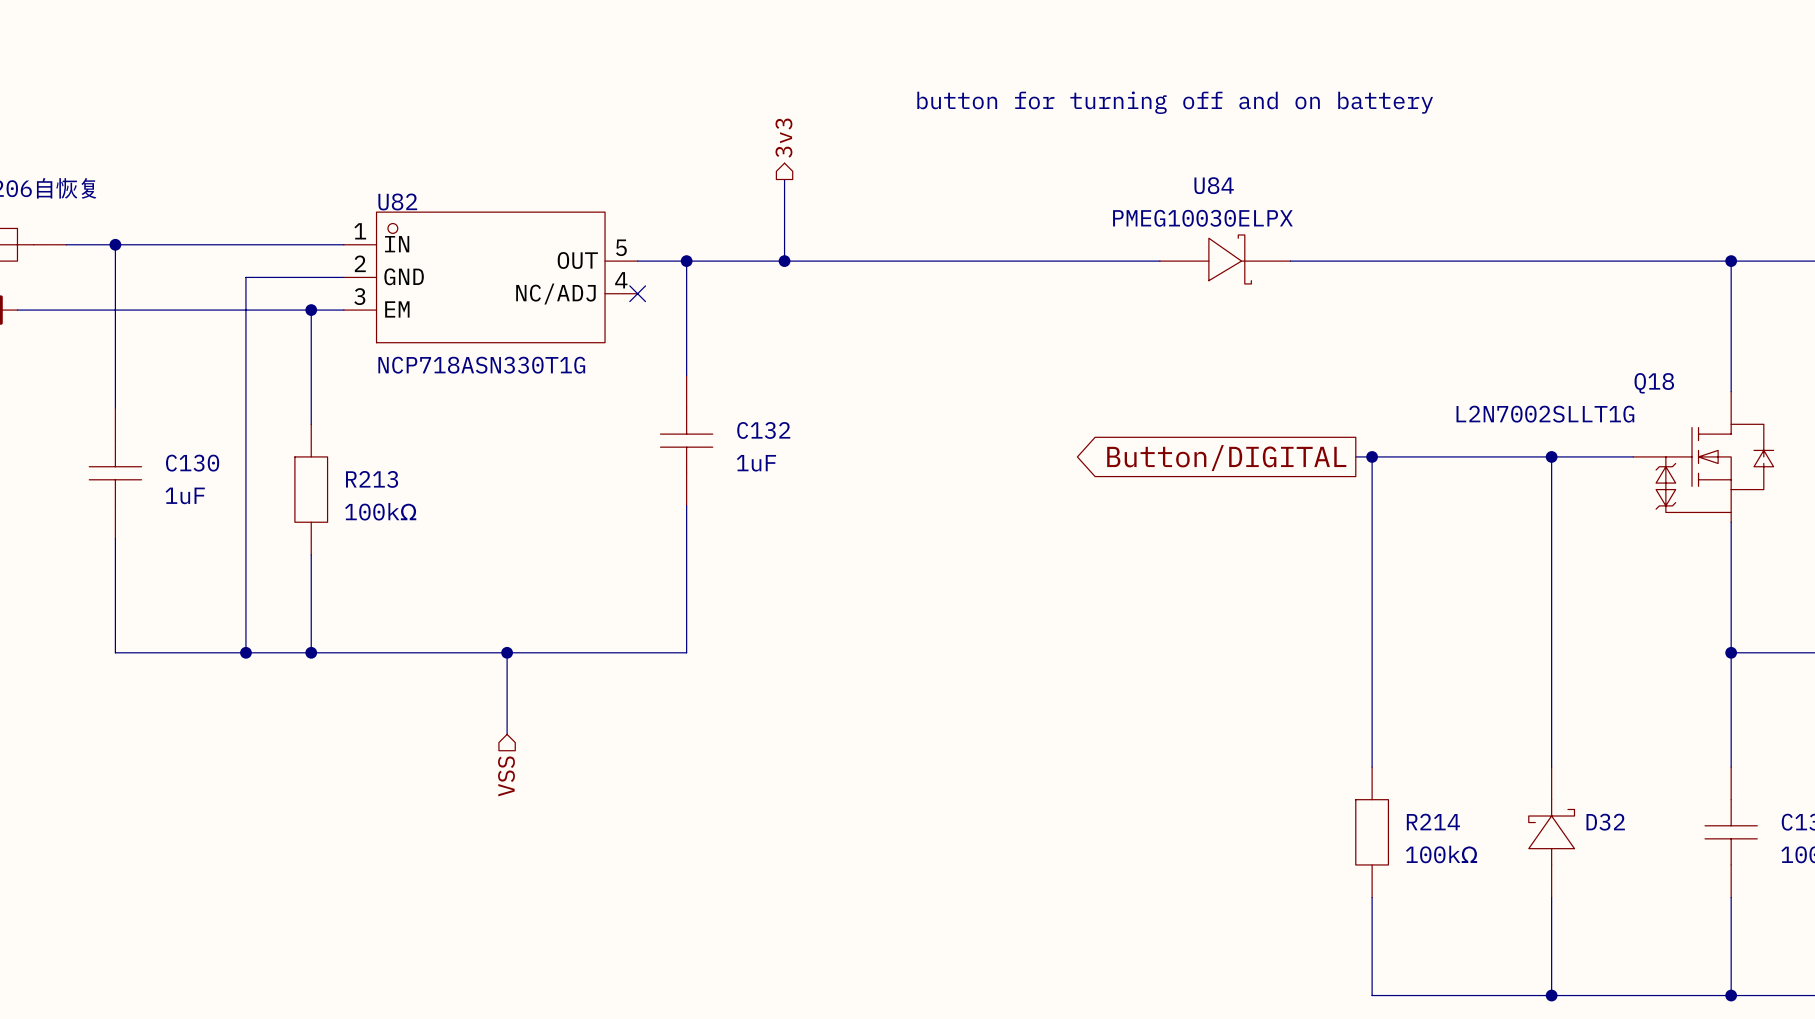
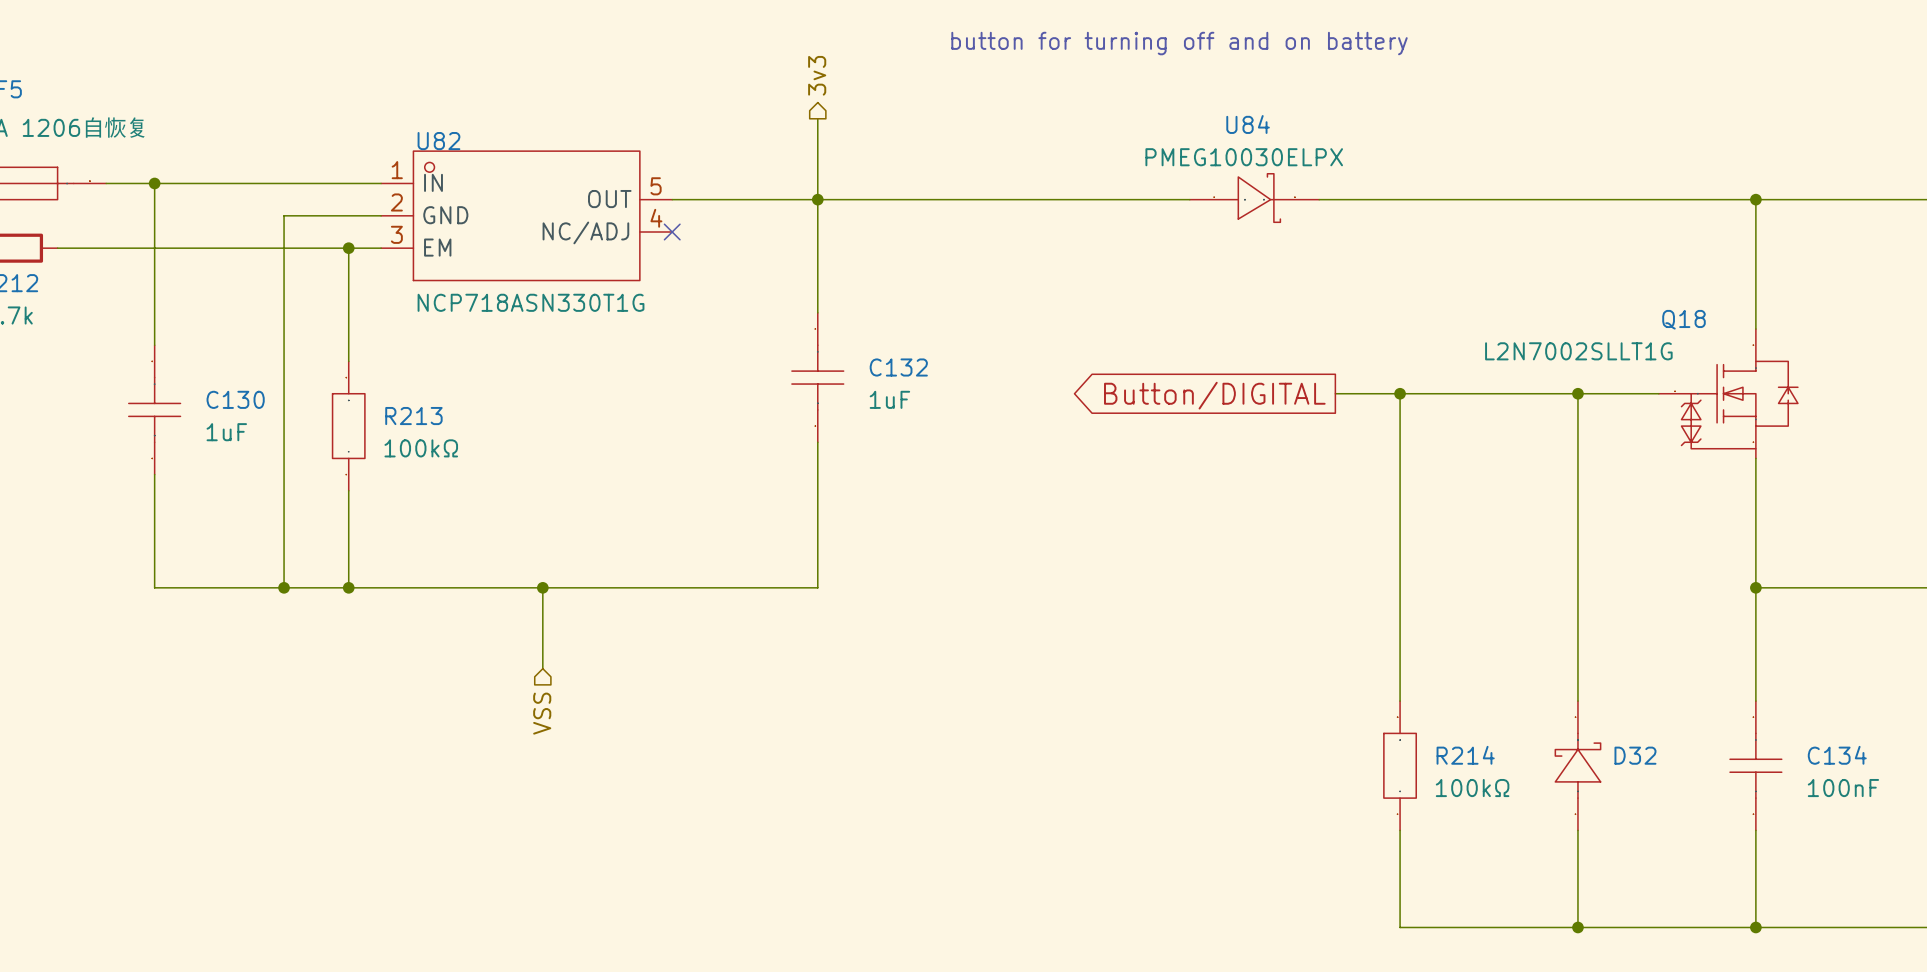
wire: (686, 261) (686, 375) -> (817, 199) (817, 312)
junction: (686, 261) -> none
C132 position: (686, 440) -> (817, 377)
wire: none -> (1335, 393) (1383, 393)
global label position: Button/DIGITAL (1226, 458) -> Button/DIGITAL (1214, 395)
wire: (686, 505) (686, 652) -> (817, 442) (817, 587) (720, 587)

